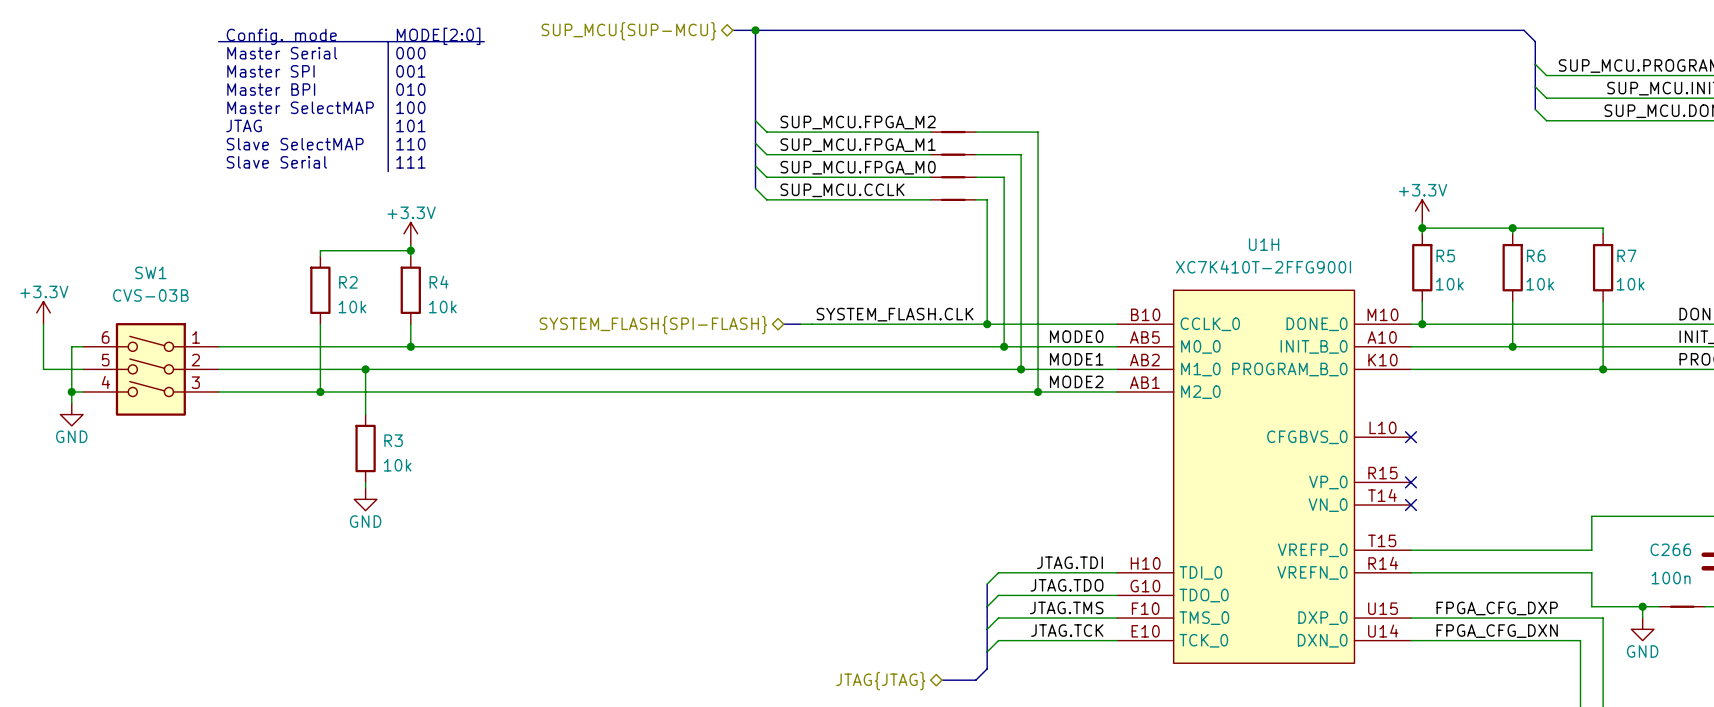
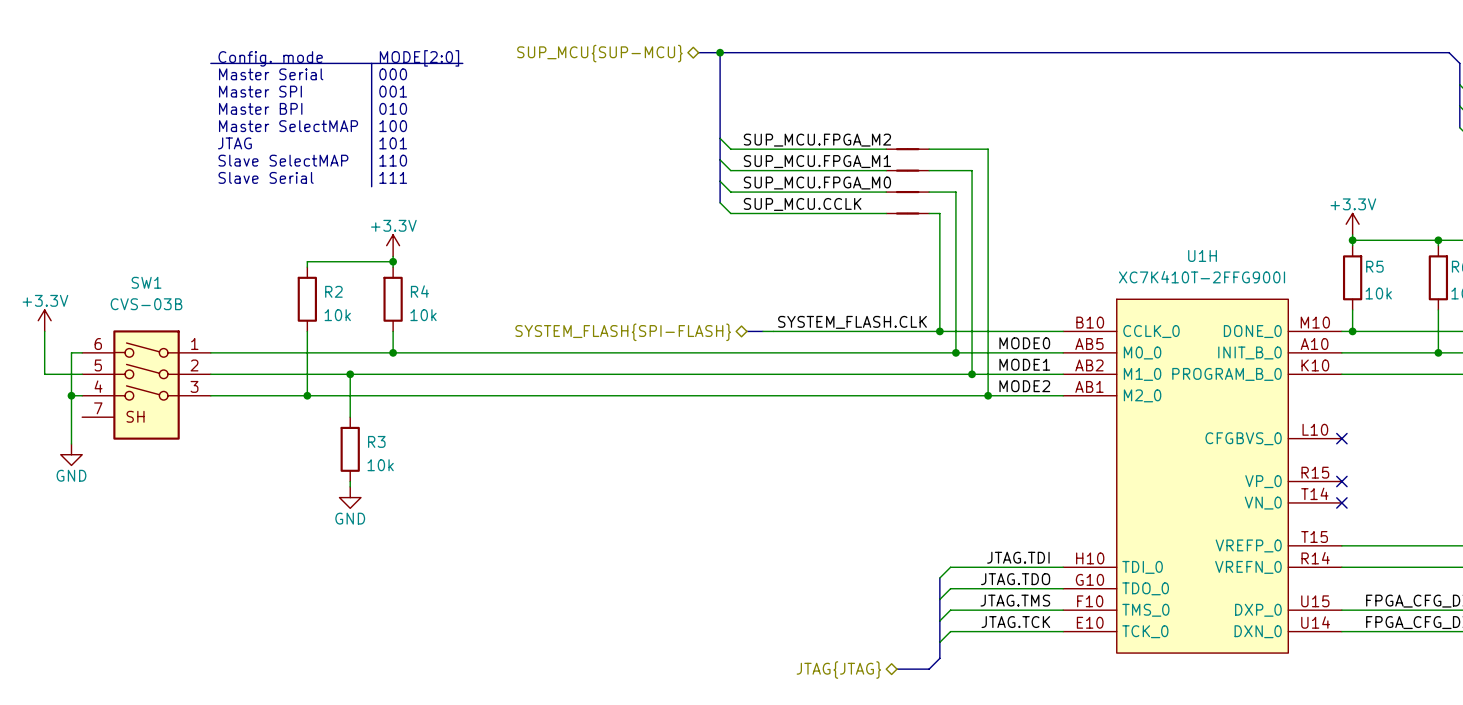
SW1 symbol: [83, 323, 219, 416] -> [82, 330, 211, 440]
wire: none -> (71, 406) (71, 443)
power symbol position: GND (71, 414) -> GND (71, 454)

